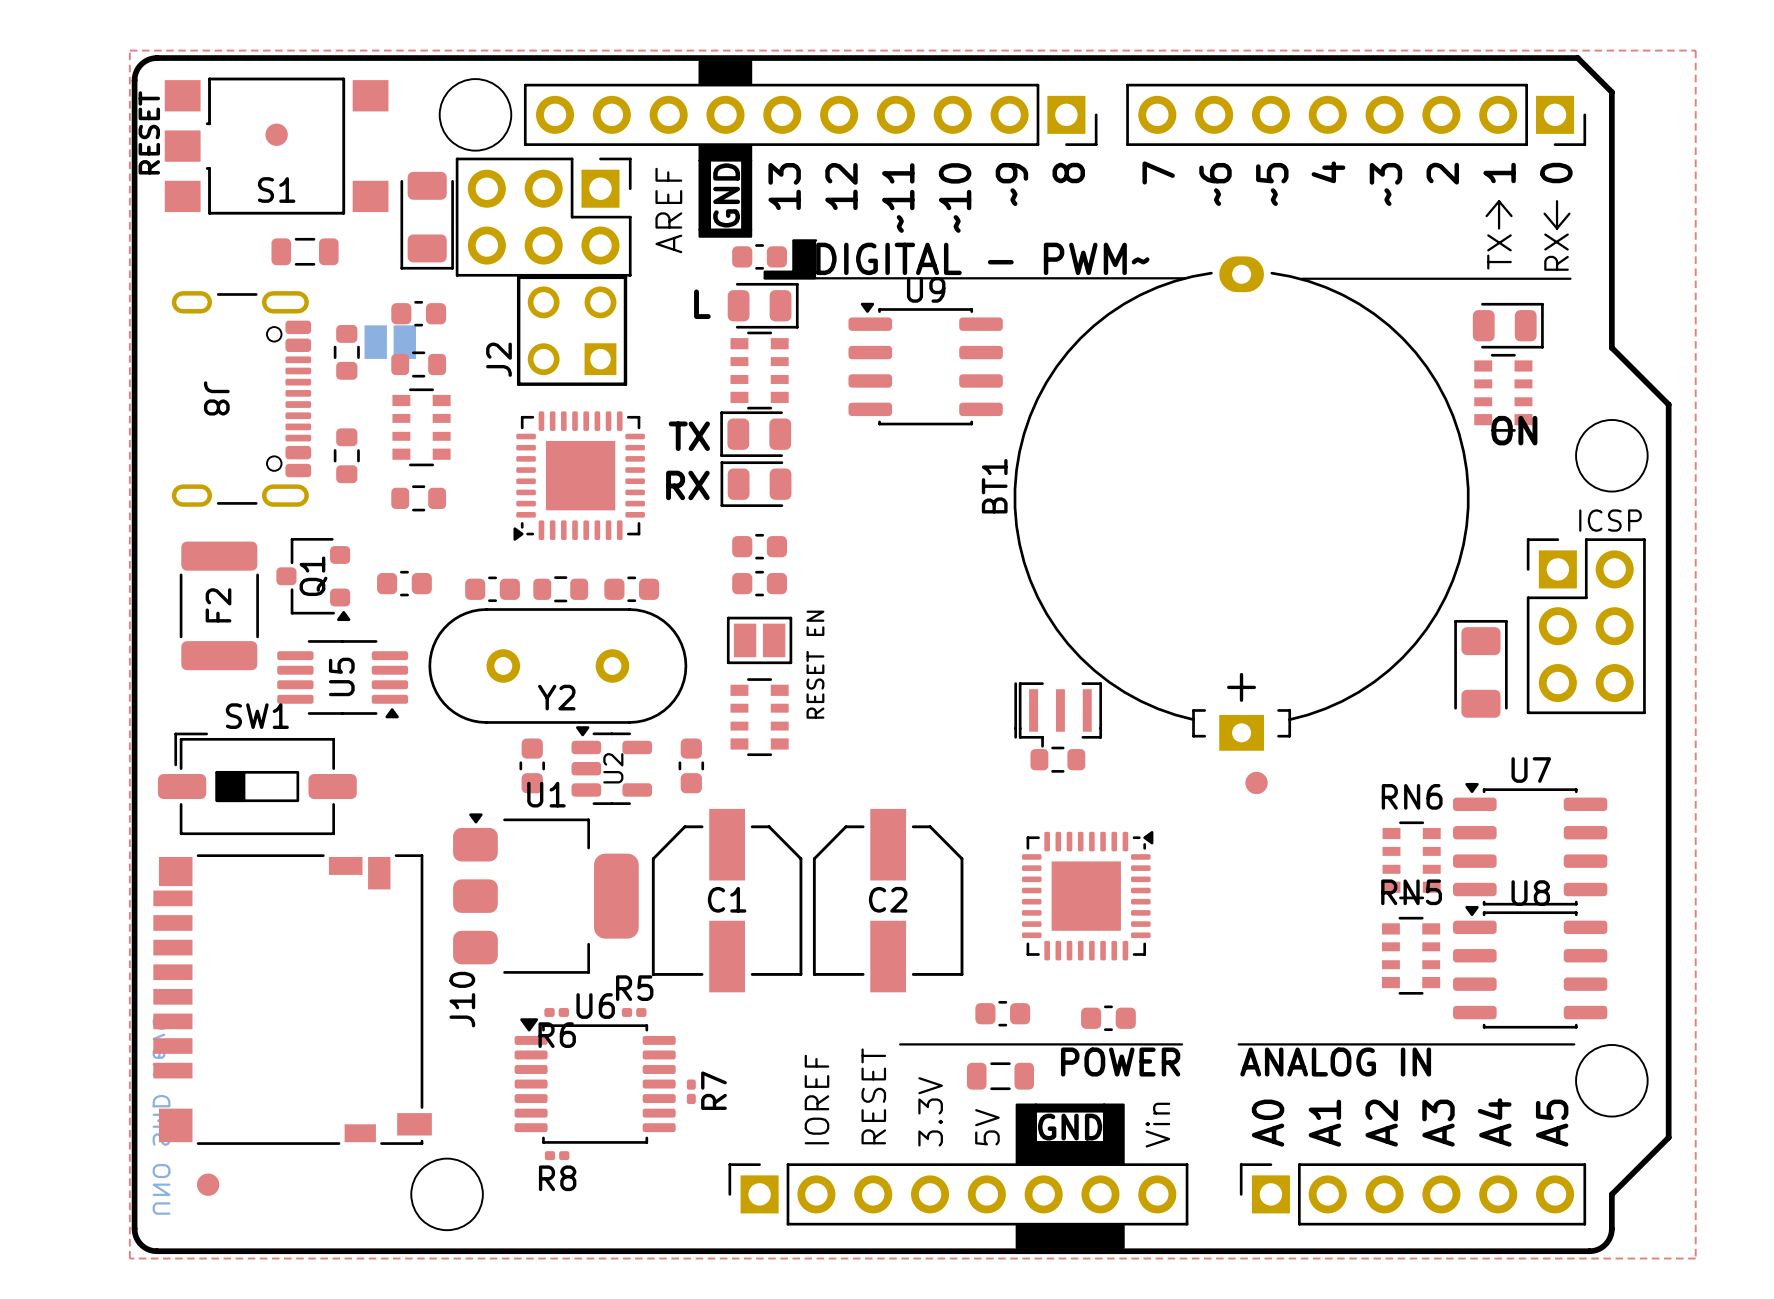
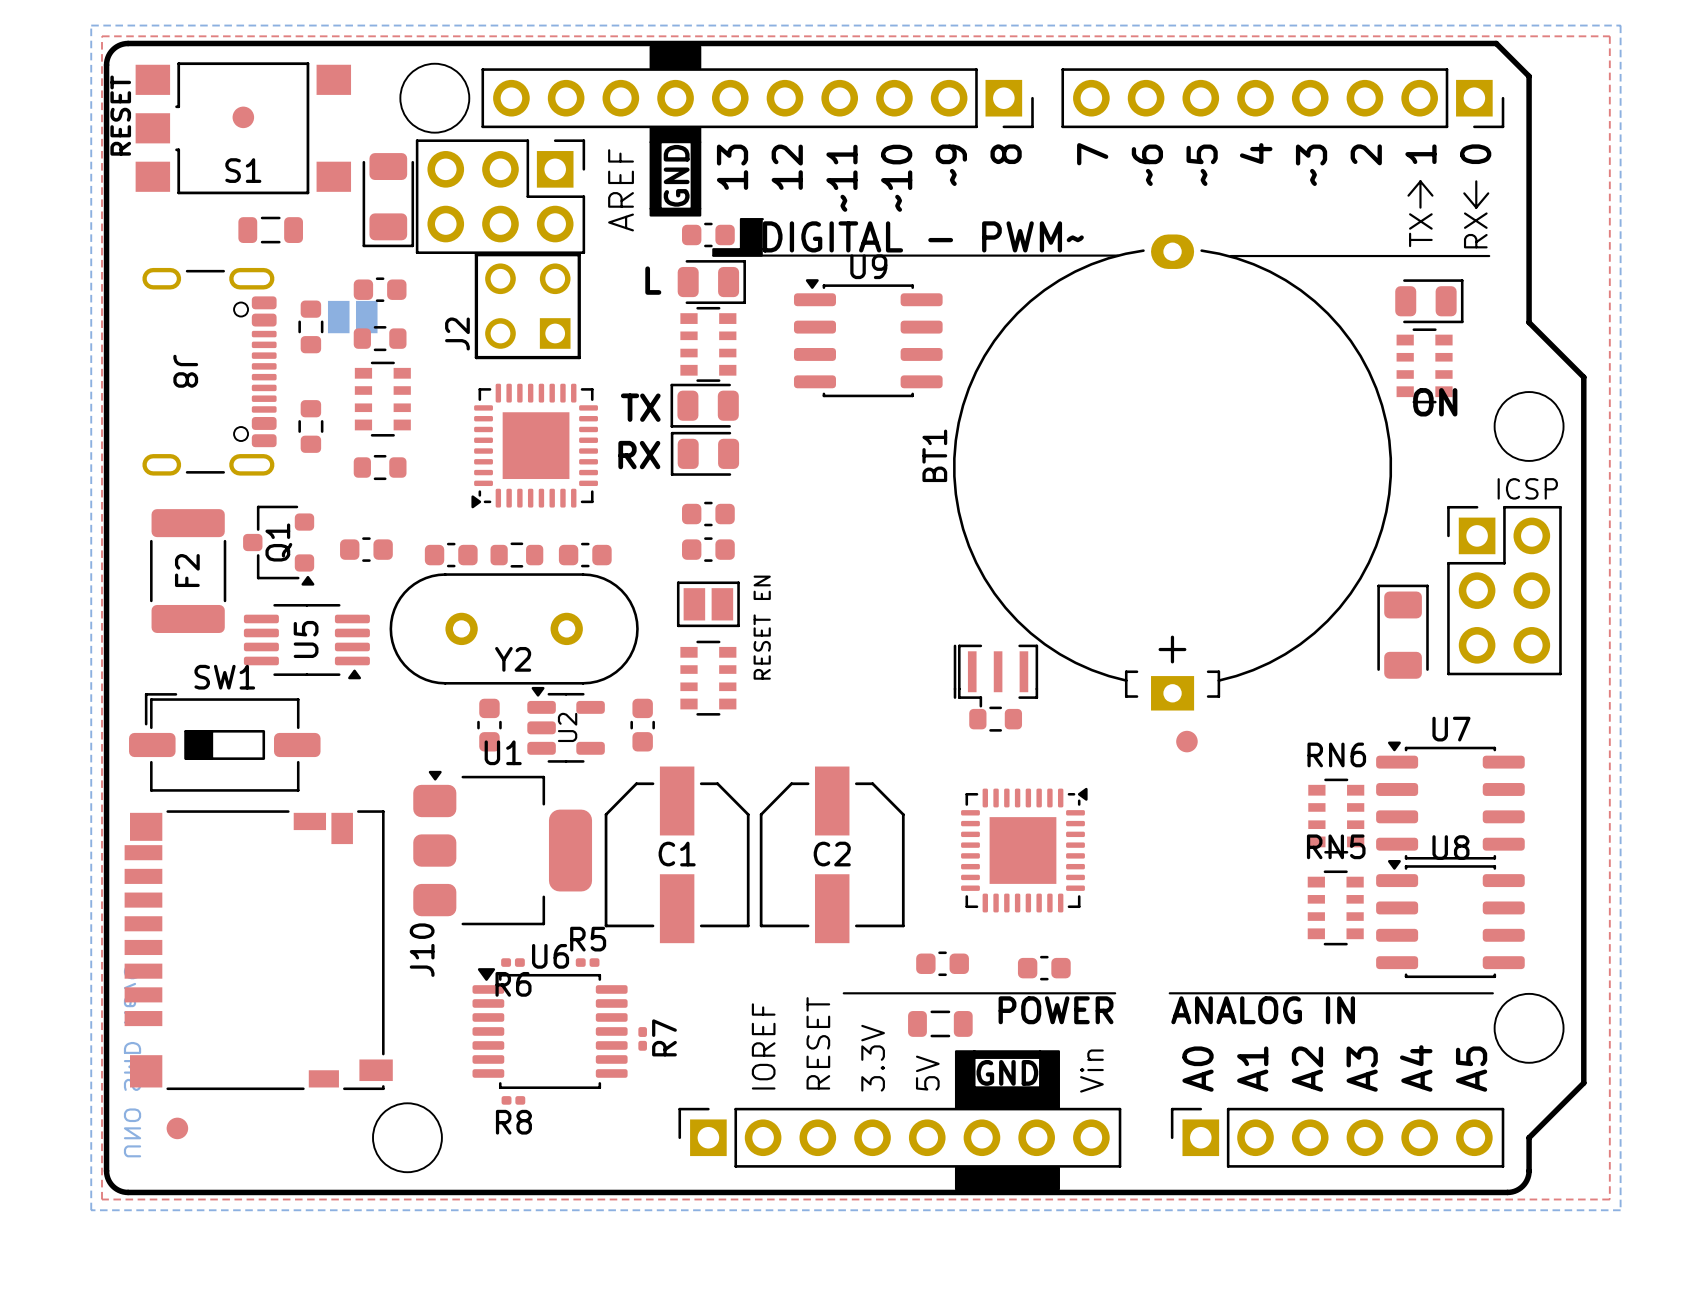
bottom zone outline: none -> (91, 25) (1620, 25) (1620, 1210) (91, 1210) (91, 25)

